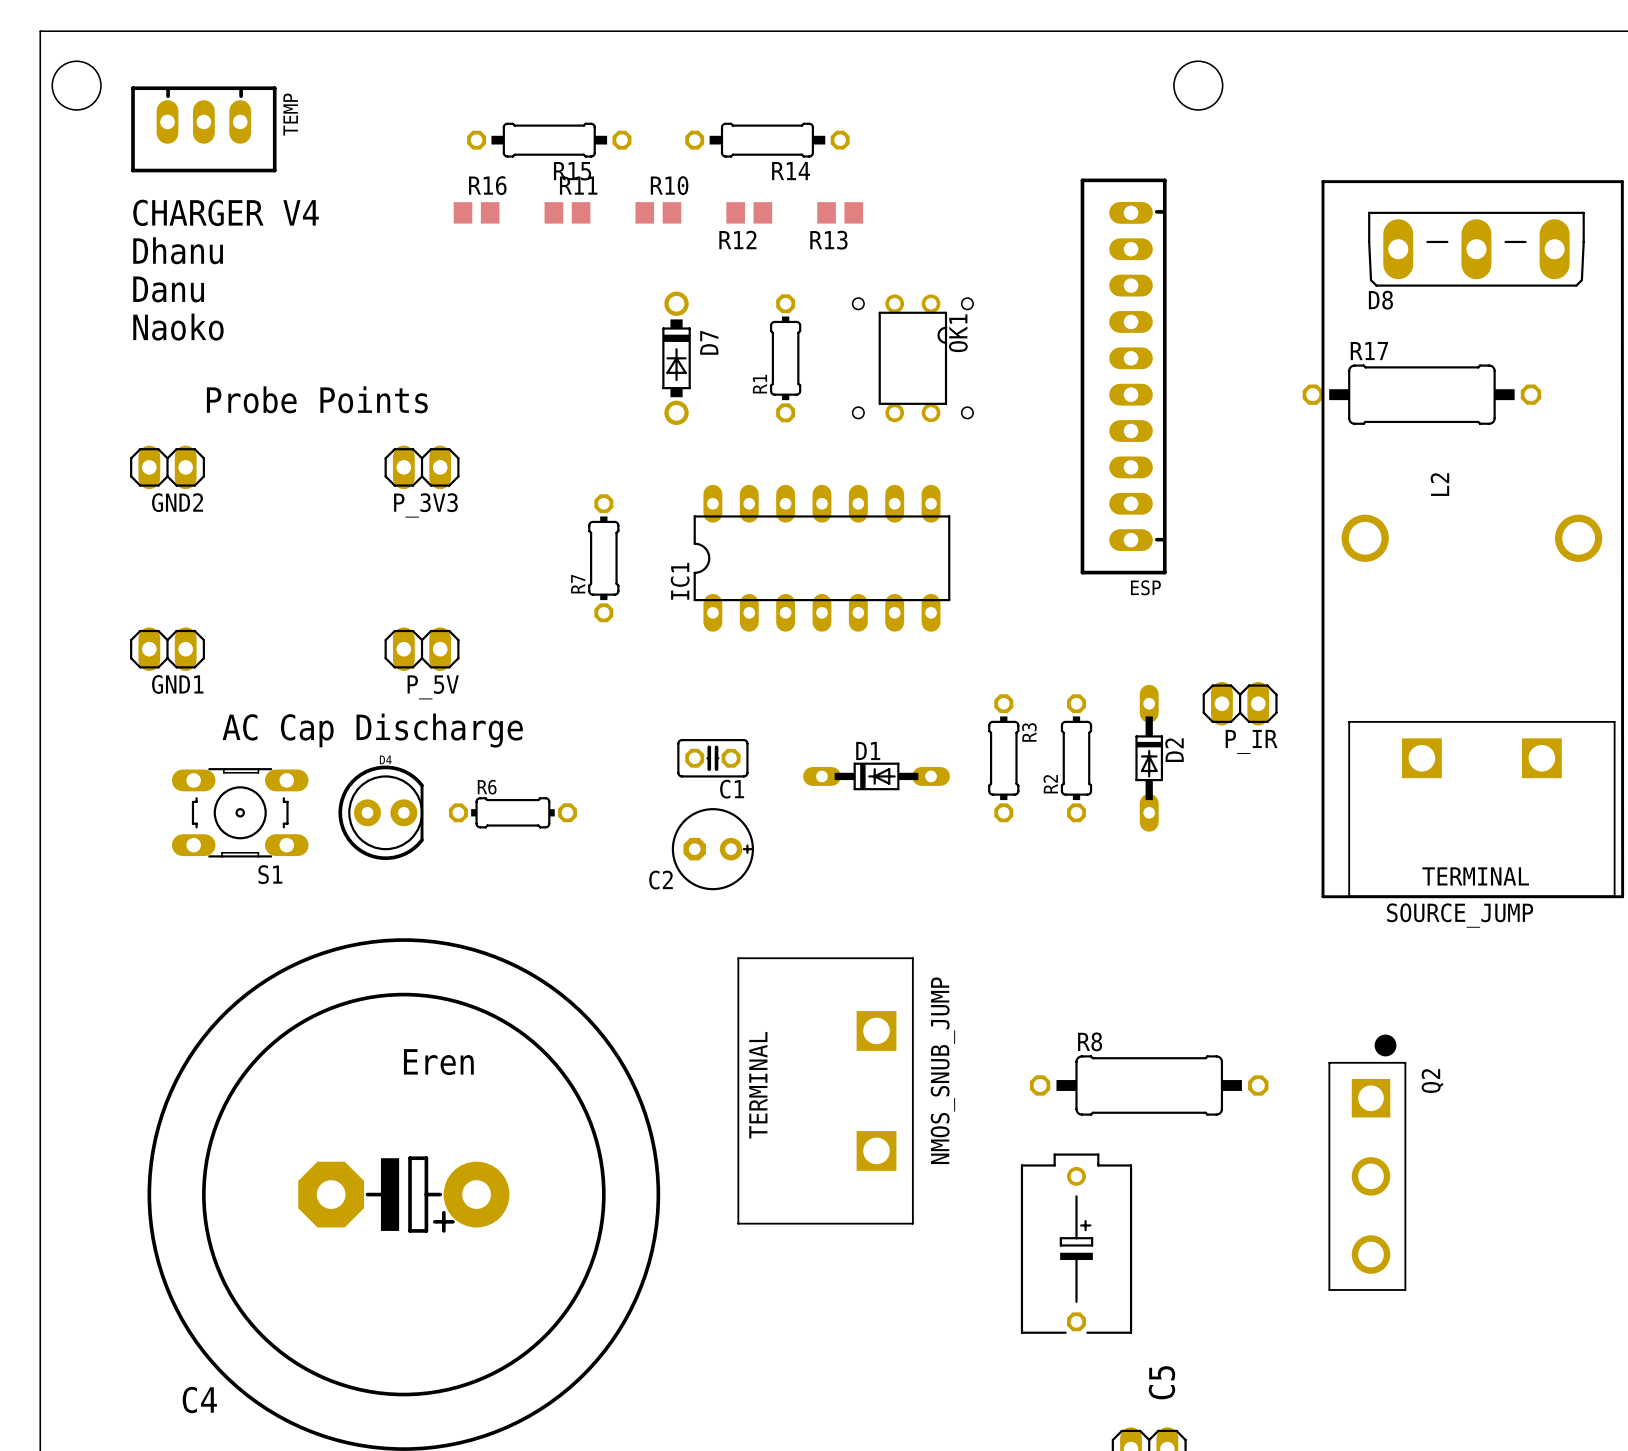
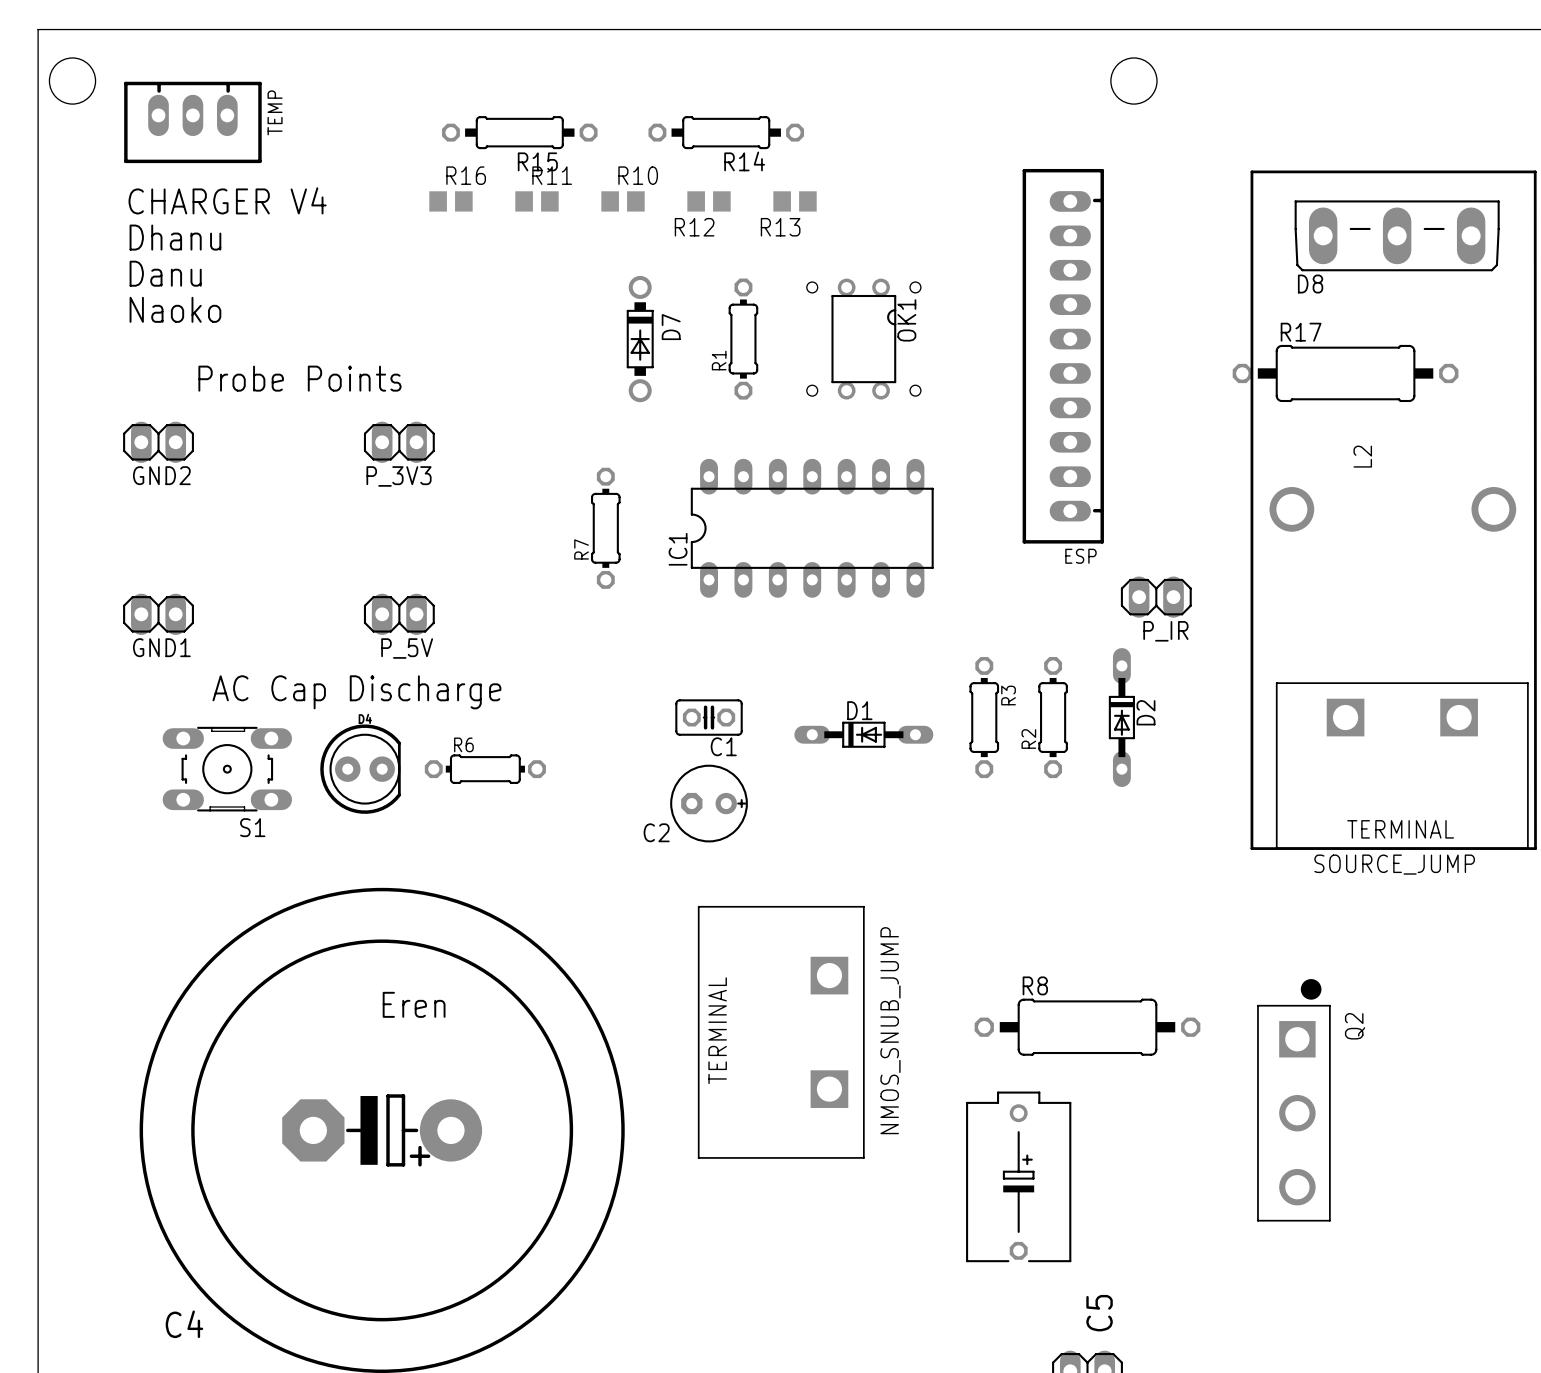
R7 position: (603, 558) -> (605, 528)
IC1 position: (821, 558) -> (812, 528)
P_IR position: (1240, 703) -> (1156, 597)
C1 position: (712, 758) -> (709, 717)
R3 position: (1003, 758) -> (984, 717)
R2 position: (1076, 758) -> (1053, 717)
D2 position: (1149, 758) -> (1121, 717)
D1 position: (876, 776) -> (863, 734)
C2 position: (712, 849) -> (709, 803)

